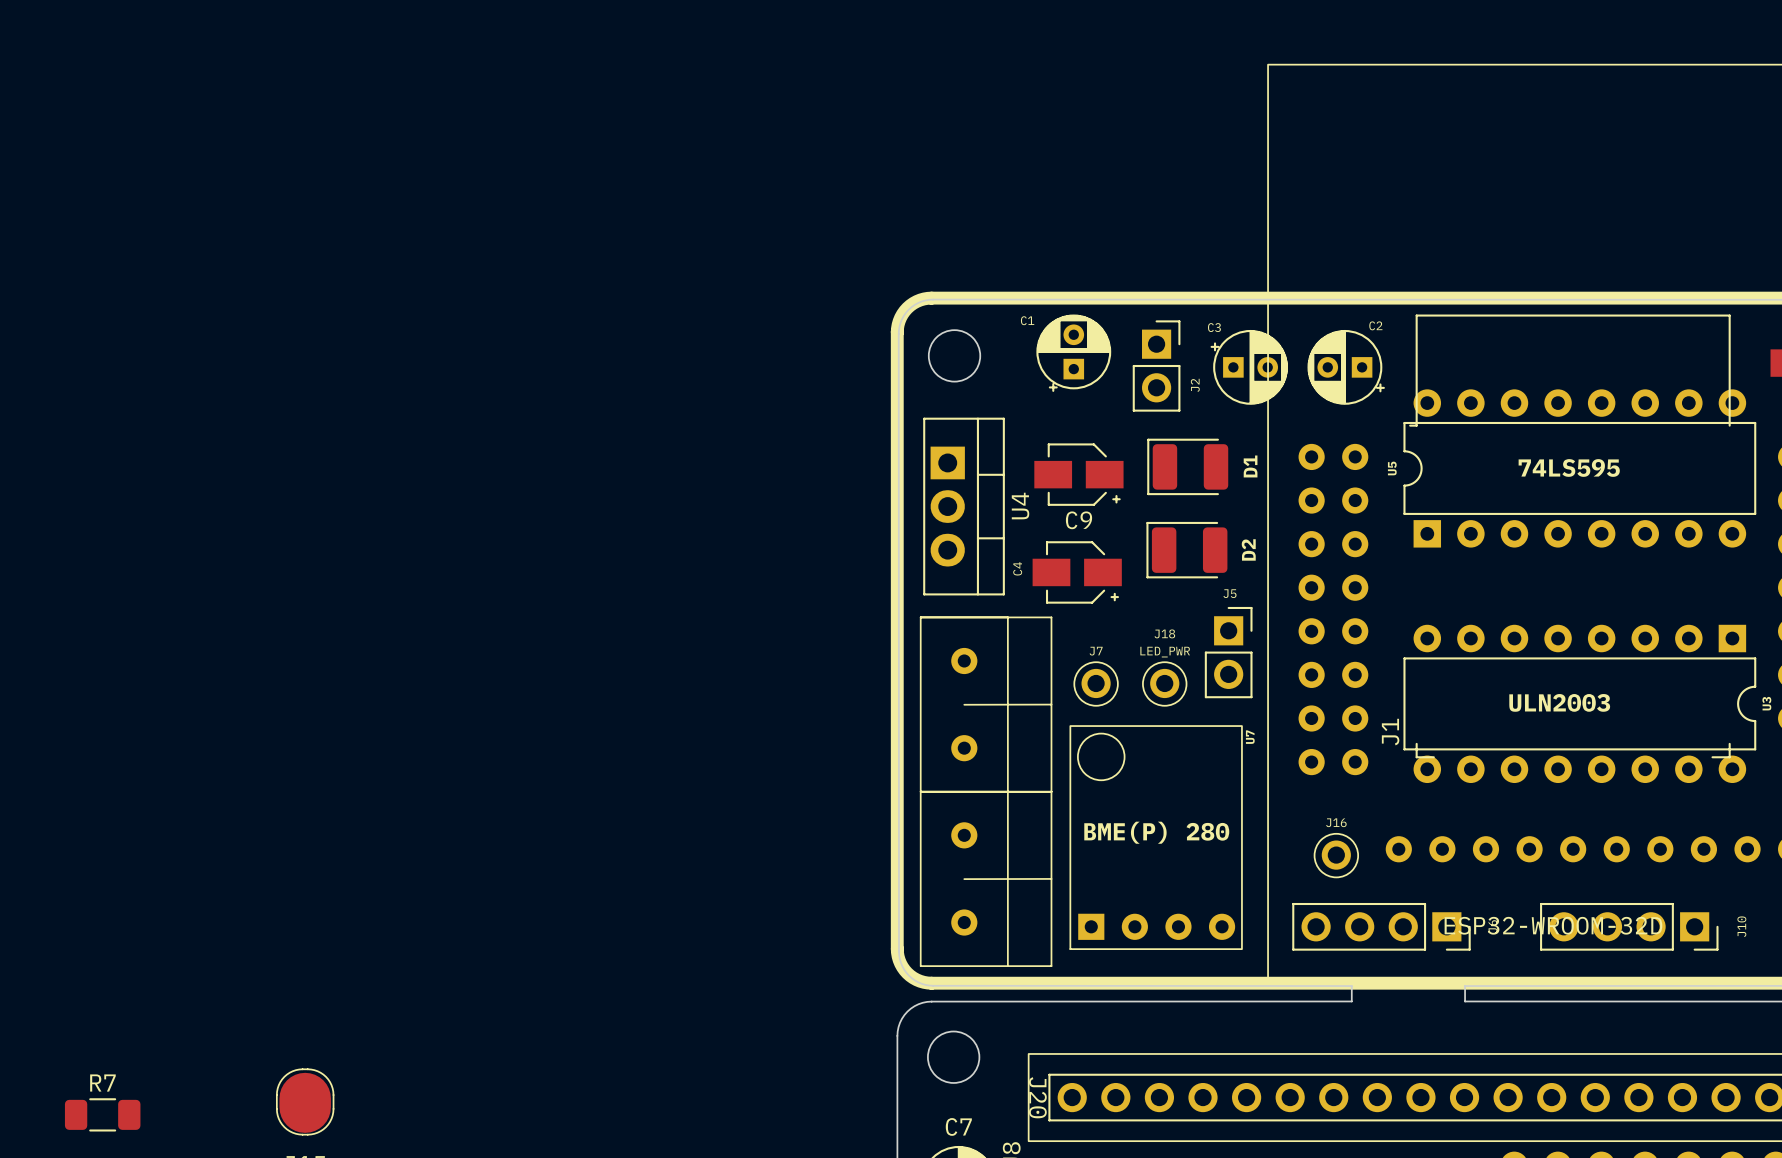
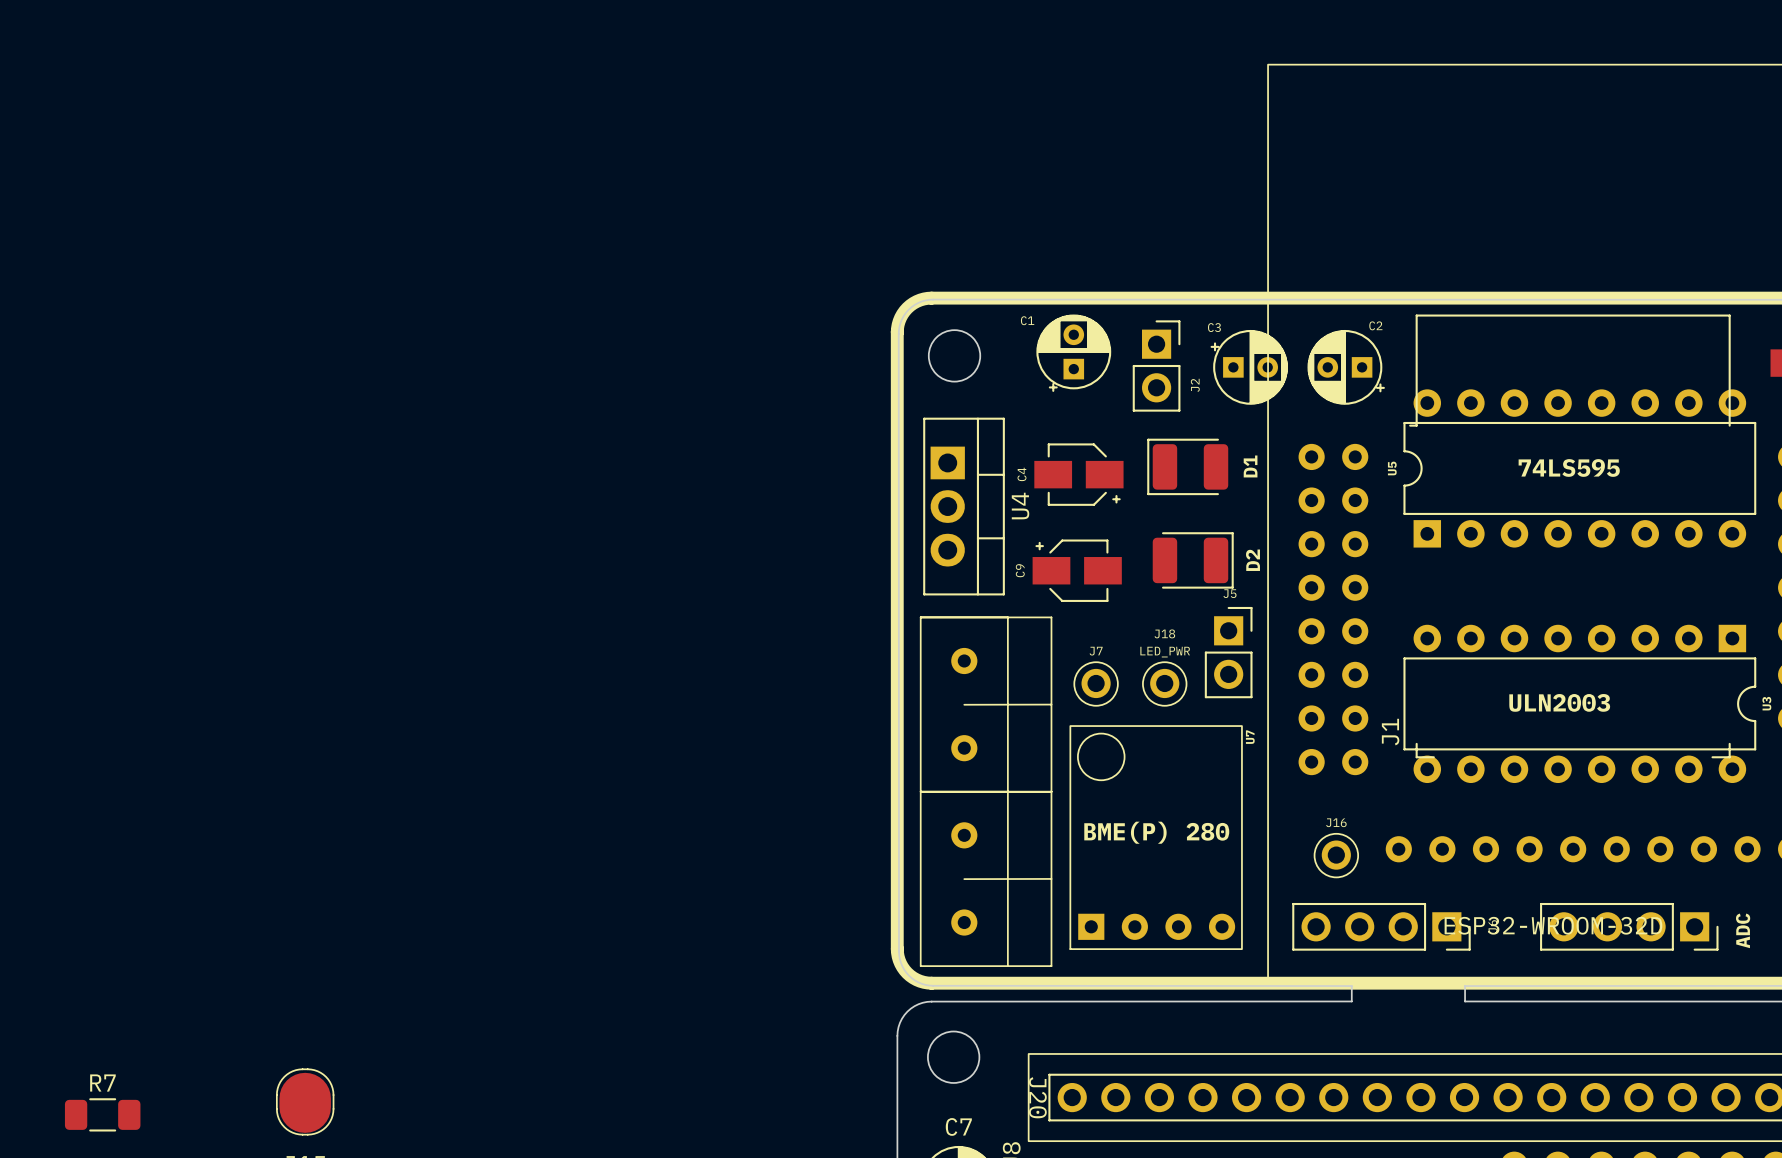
C9 name: C9 (1079, 520) -> C4 (1021, 474)
D2 rotation: 0° (1186, 550) -> 180° (1193, 560)
C9: none -> (1077, 570)
C4: (1077, 572) -> none
J10 name: J10 (1741, 926) -> none
text: none -> ADC (1743, 930)

